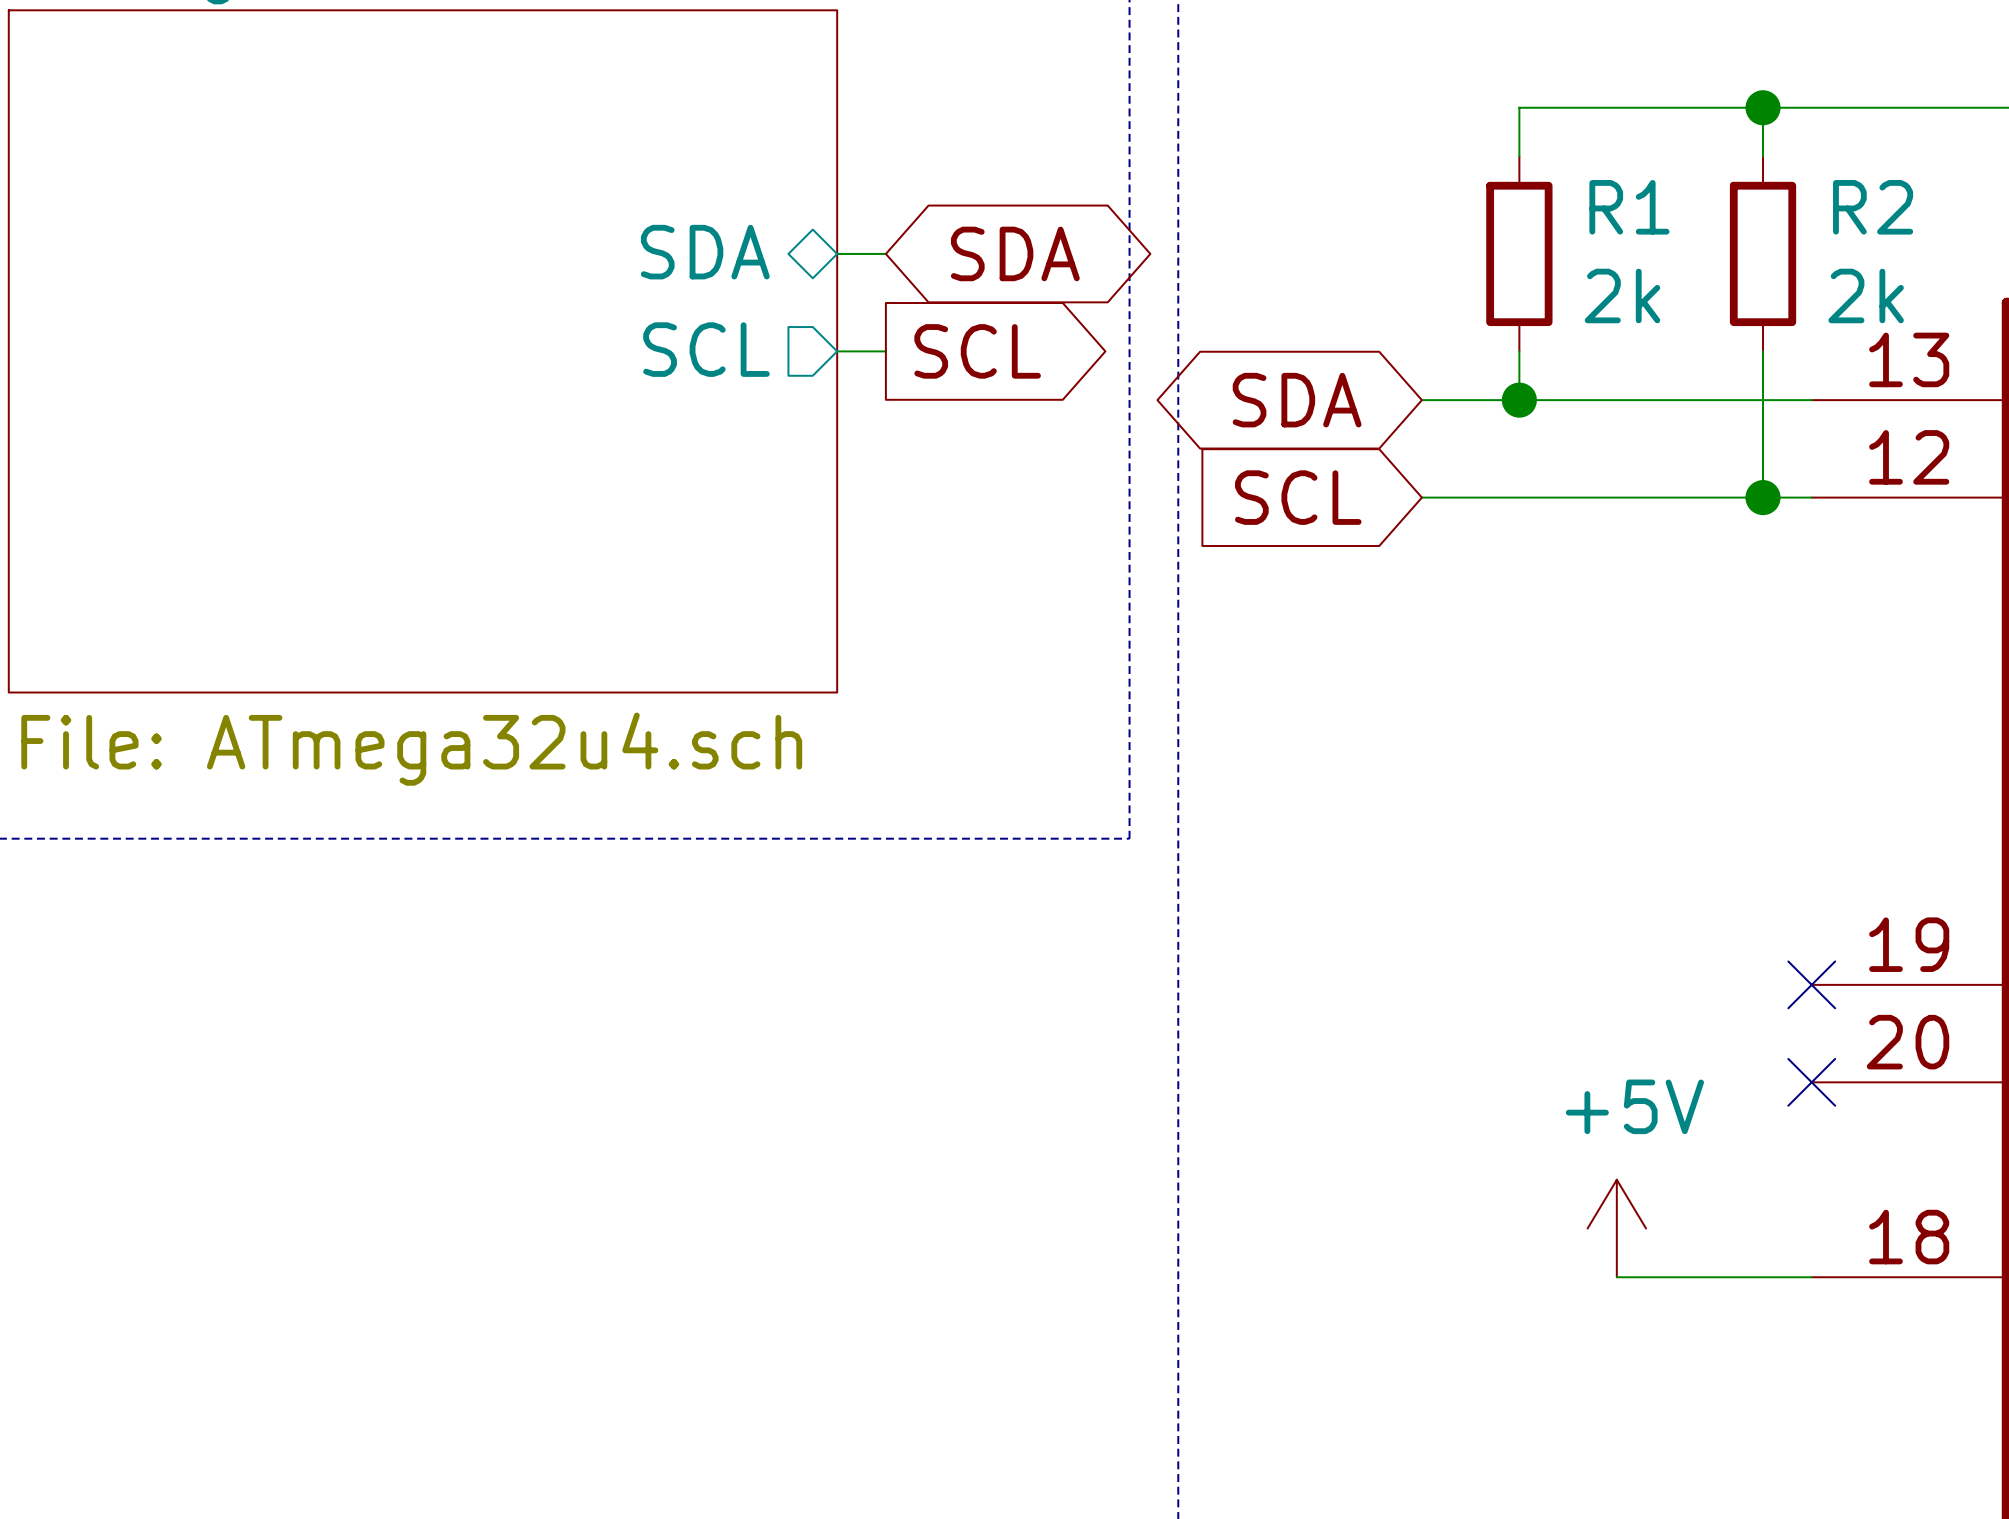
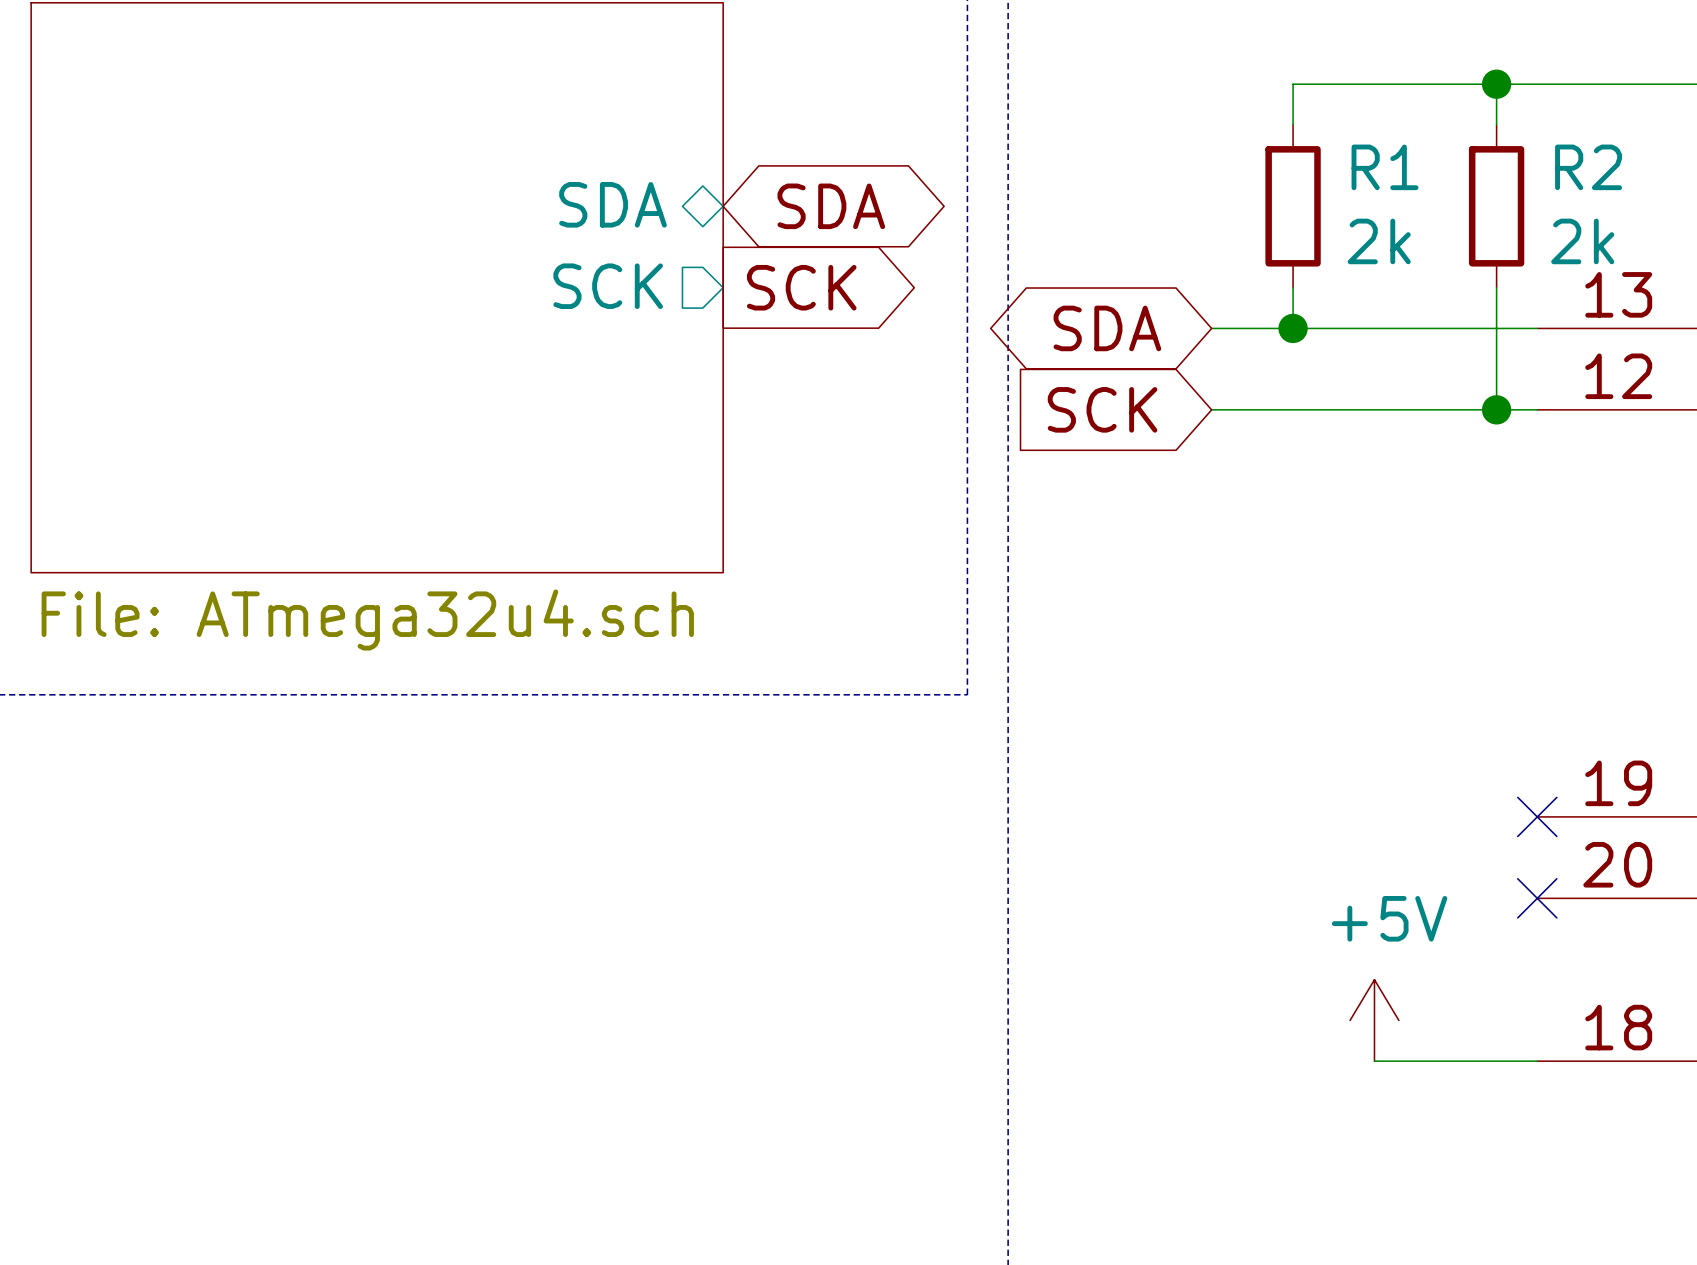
wire: (837, 253) (885, 253) -> none
global label position: SDA (1015, 253) -> SDA (831, 206)
sheet pin: SCL (706, 349) -> SCK (608, 286)
wire: (837, 351) (885, 351) -> none
global label: SCL (977, 351) -> SCK (801, 287)
global label: SCL (1298, 497) -> SCK (1102, 409)

